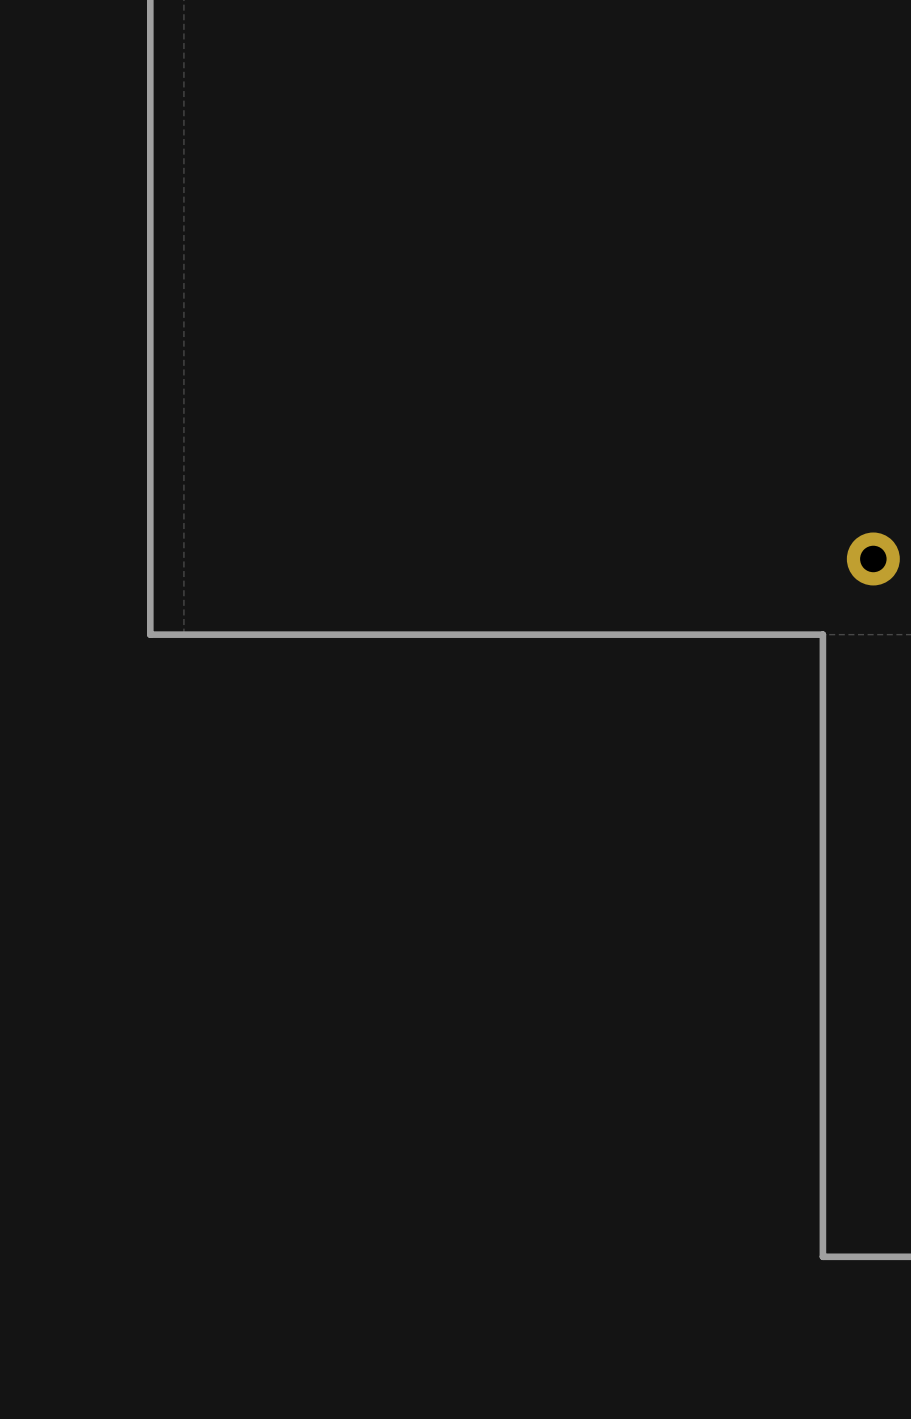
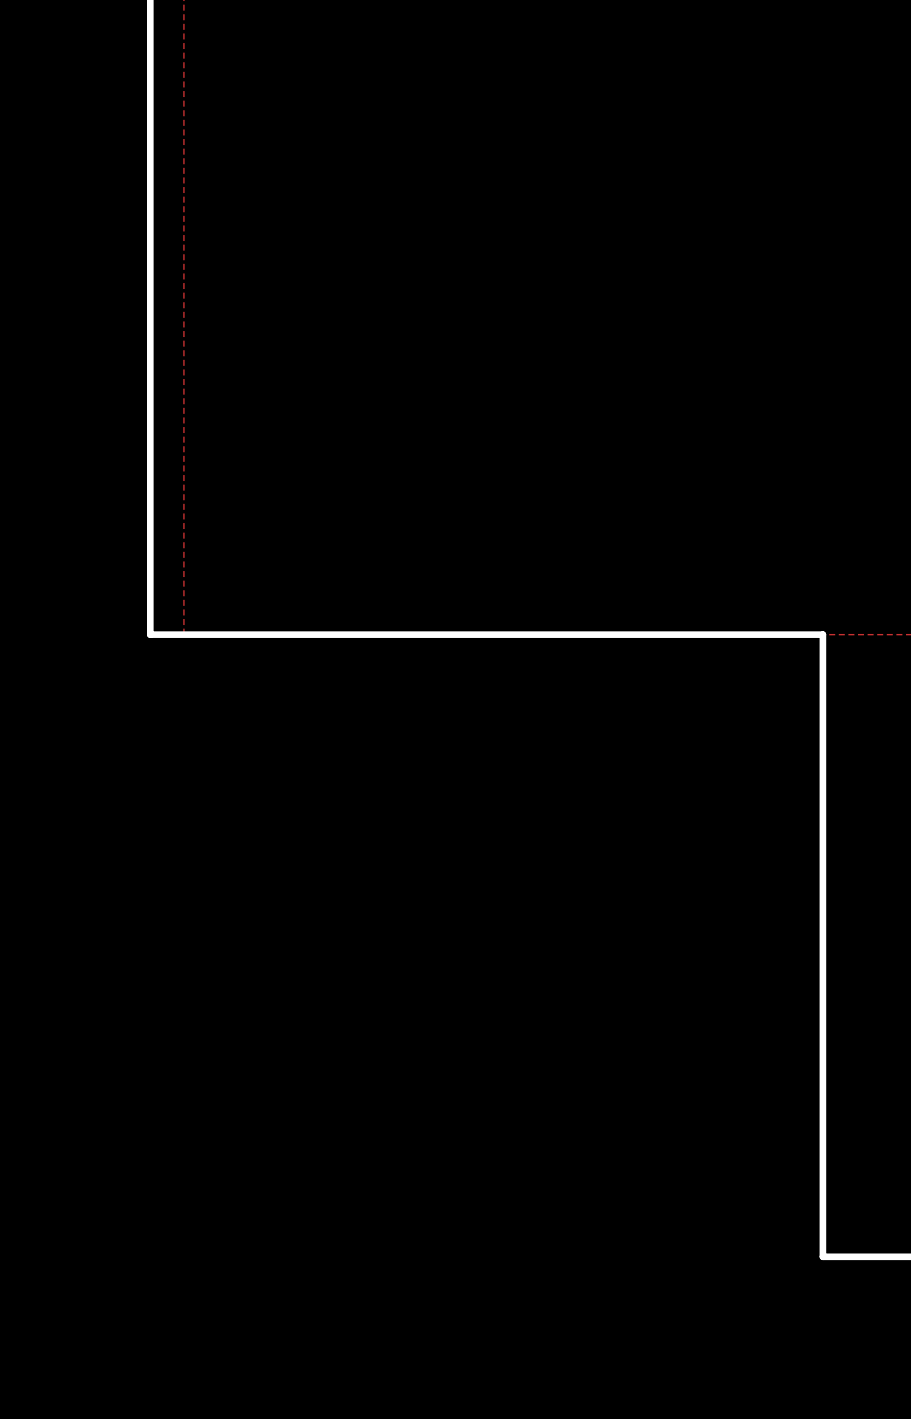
via: (873, 558) -> none

